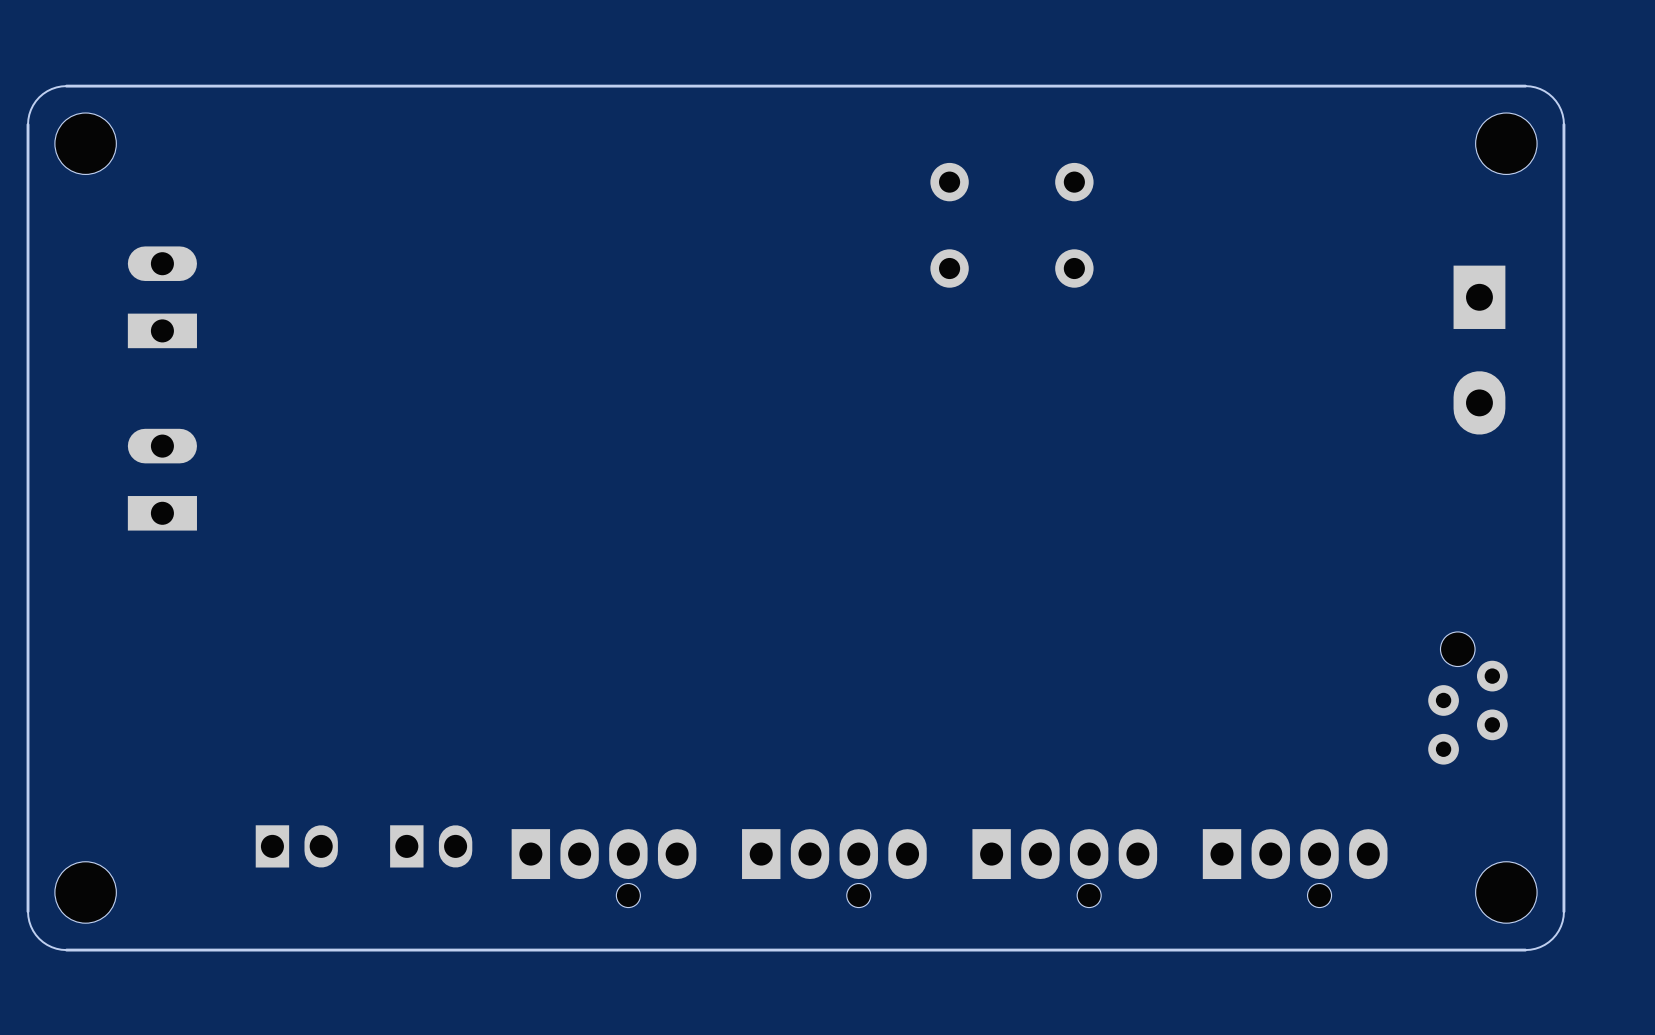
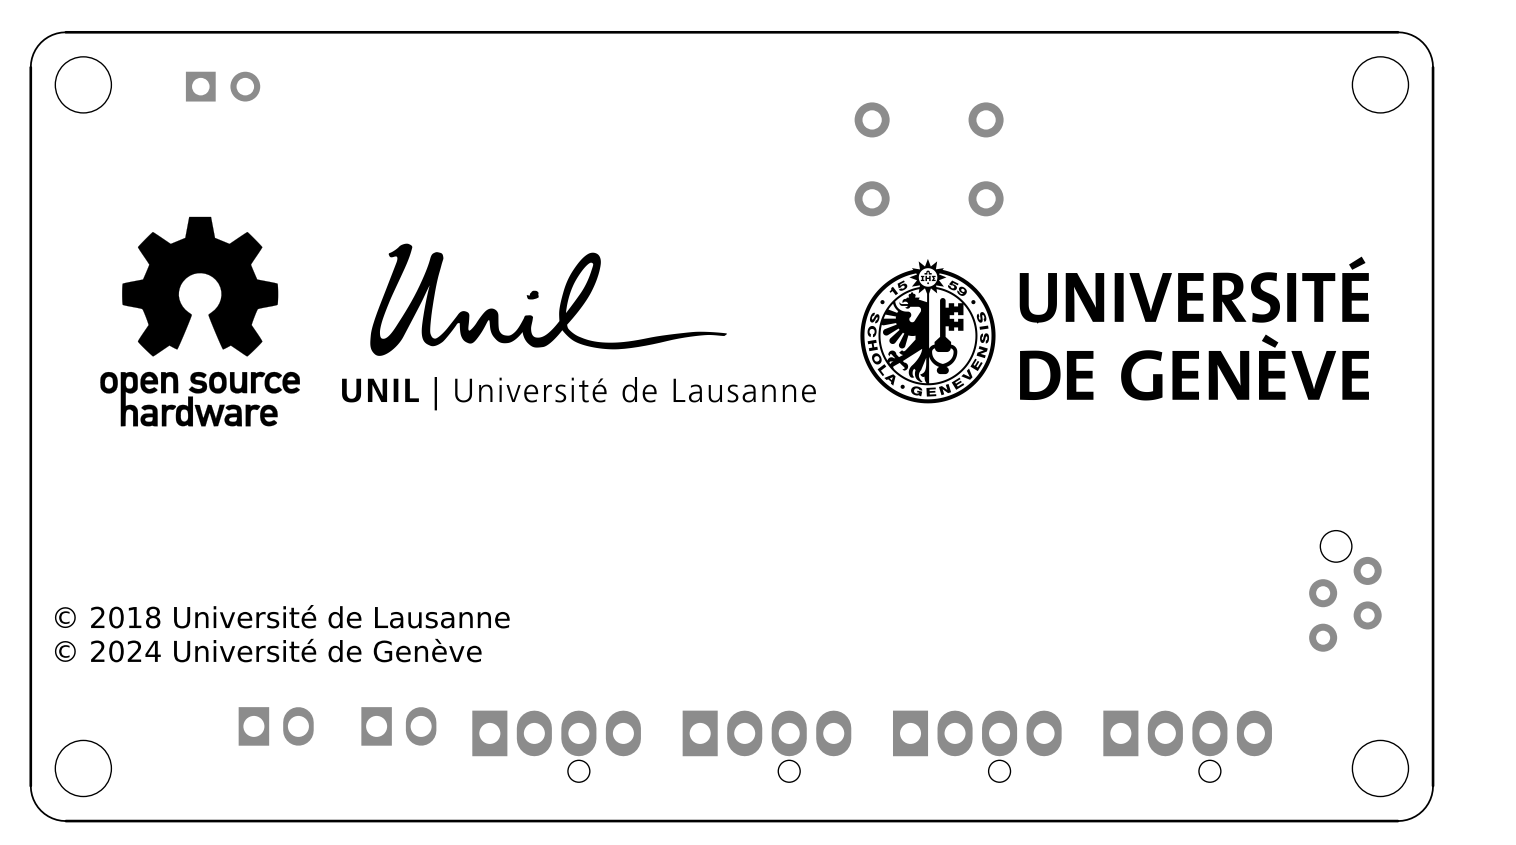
part: none -> (223, 86)
drawing: none -> [100, 216, 301, 427]
part: (162, 297) -> none
drawing: none -> [370, 243, 727, 356]
drawing: none -> [1019, 256, 1369, 401]
drawing: none -> [860, 258, 996, 404]
part: (1479, 350) -> none
drawing: none -> [1020, 350, 1094, 401]
drawing: none -> [342, 377, 816, 411]
part: (162, 479) -> none
text: none -> © 2018 Université de Lausanne (282, 616)
text: none -> © 2024 Université de Genève (268, 650)

